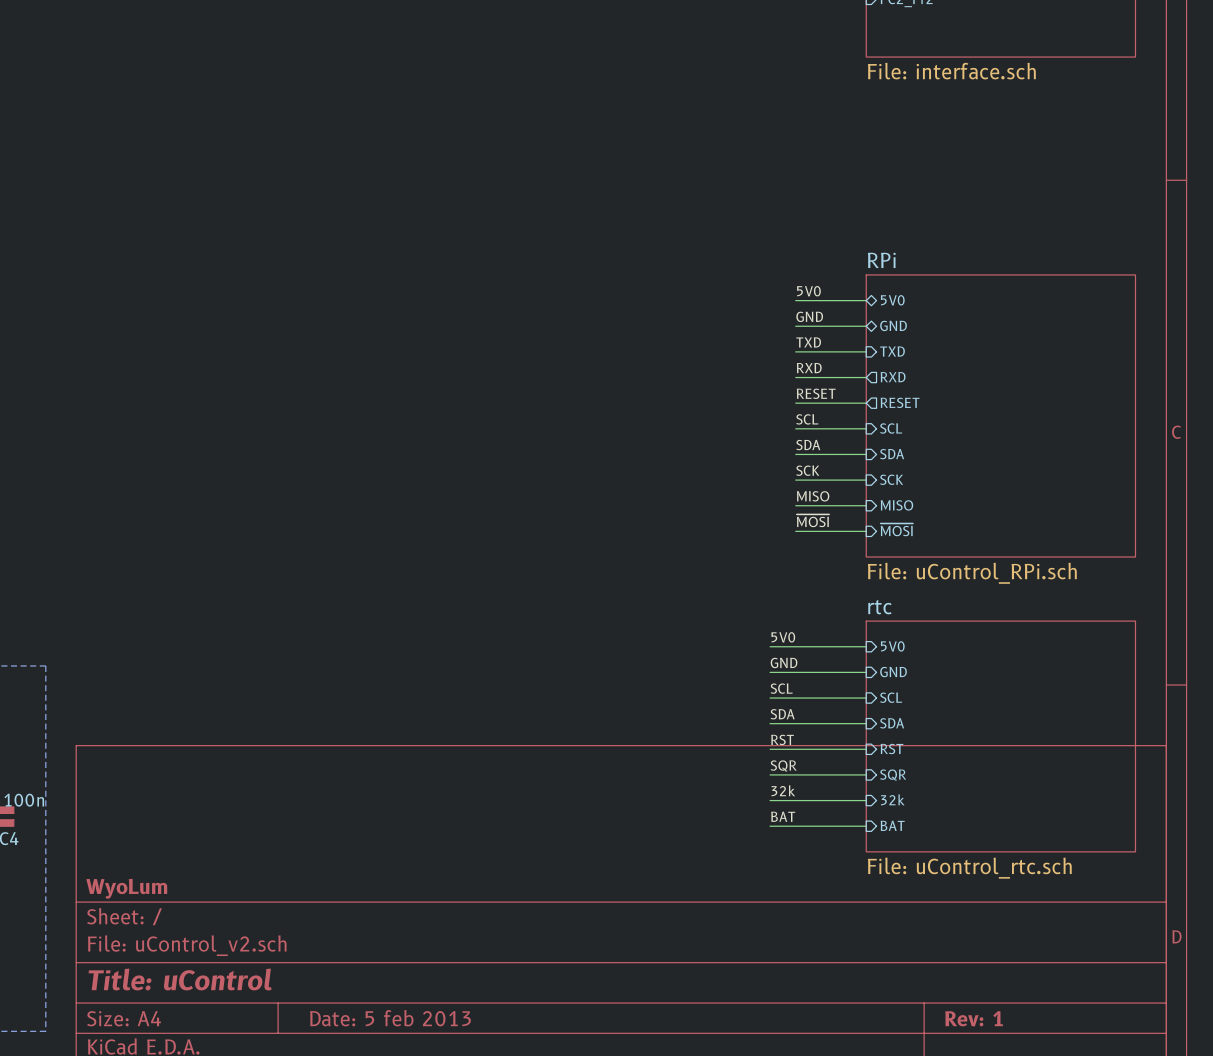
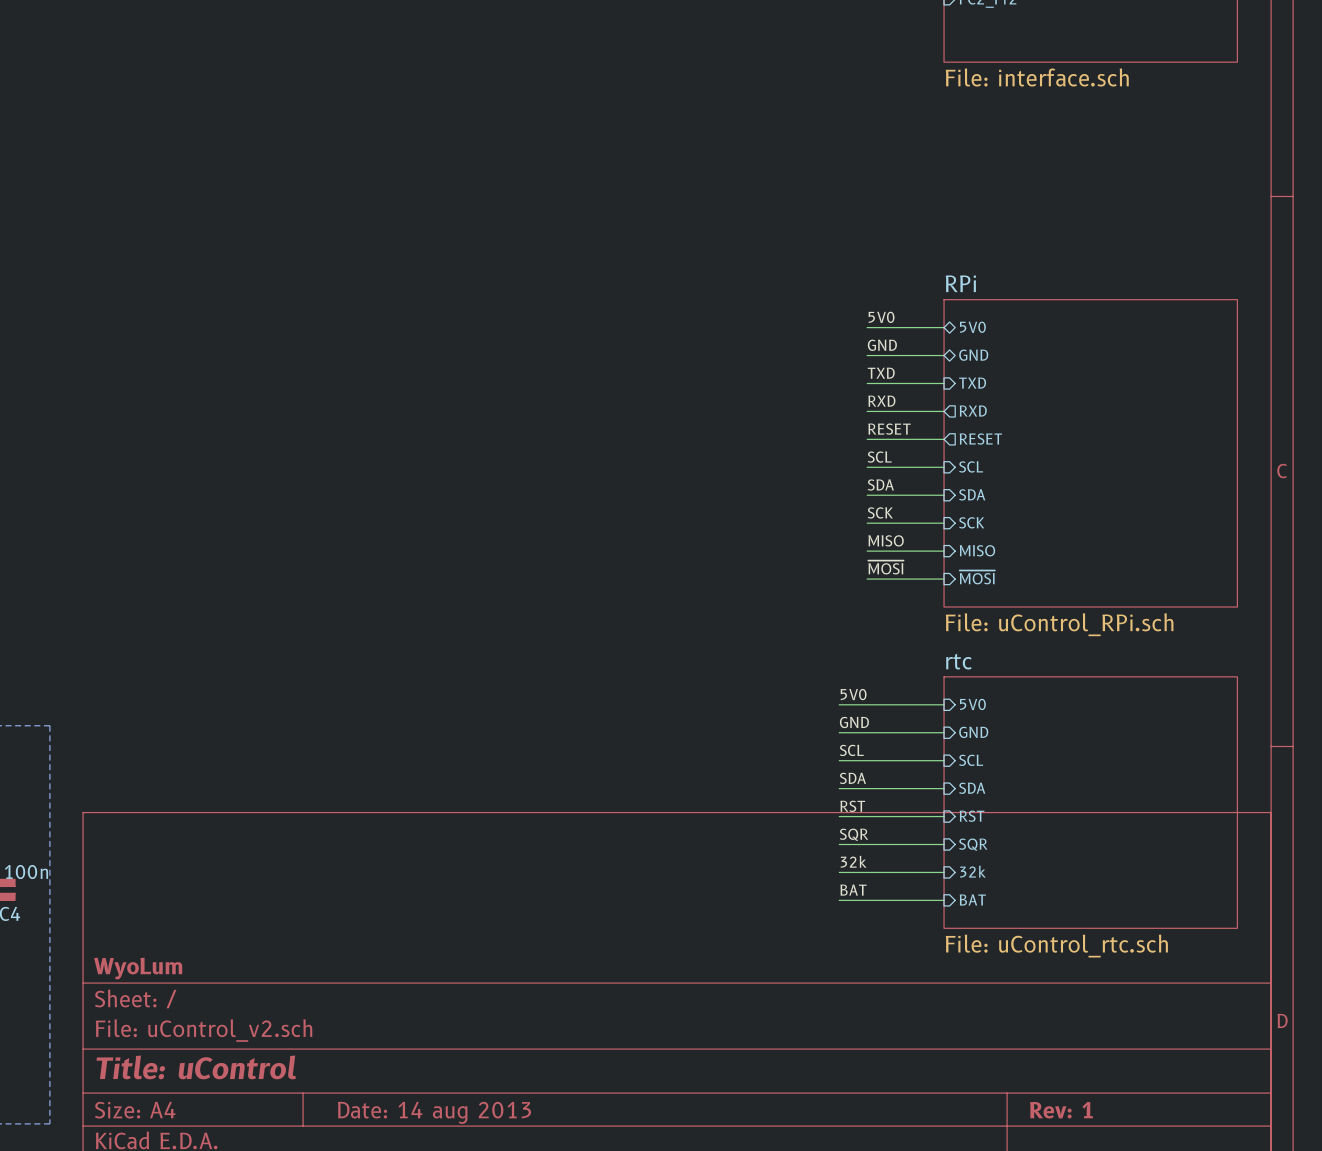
title block: Date: 5 feb 2013 (390, 1018) -> Date: 14 aug 2013 (434, 1112)

